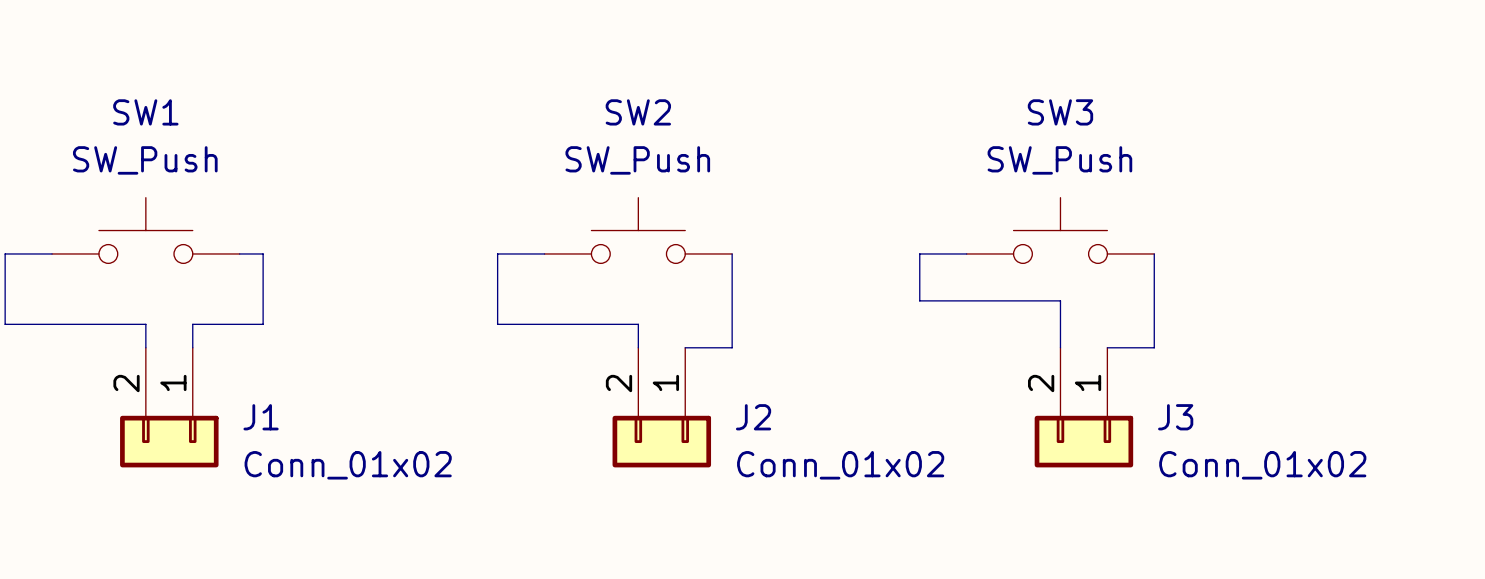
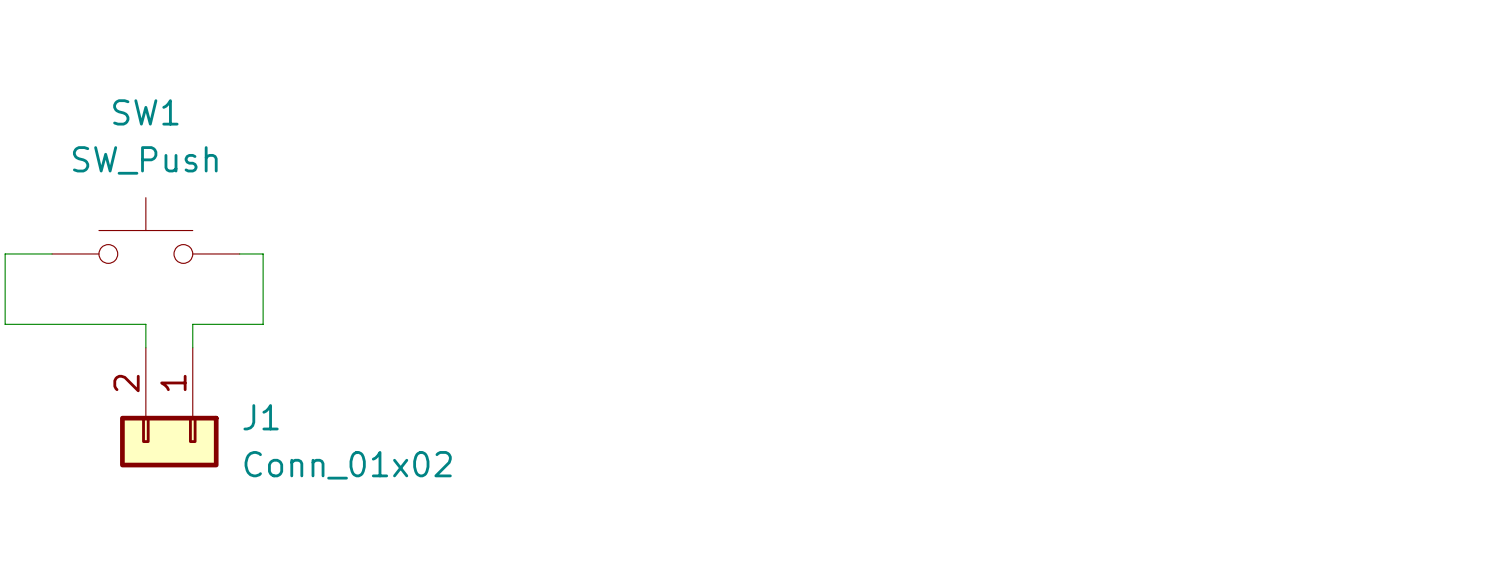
SW2: SW_Push (638, 230) -> none
SW3: SW_Push (1060, 230) -> none
wire: (544, 253) (497, 253) (497, 324) (638, 324) (638, 347) -> none
wire: (732, 253) (732, 347) (685, 347) -> none
wire: (966, 253) (919, 253) (919, 300) (1060, 300) (1060, 347) -> none
wire: (1154, 253) (1154, 347) (1107, 347) -> none
J2: Conn_01x02 (661, 407) -> none
J3: Conn_01x02 (1083, 407) -> none

